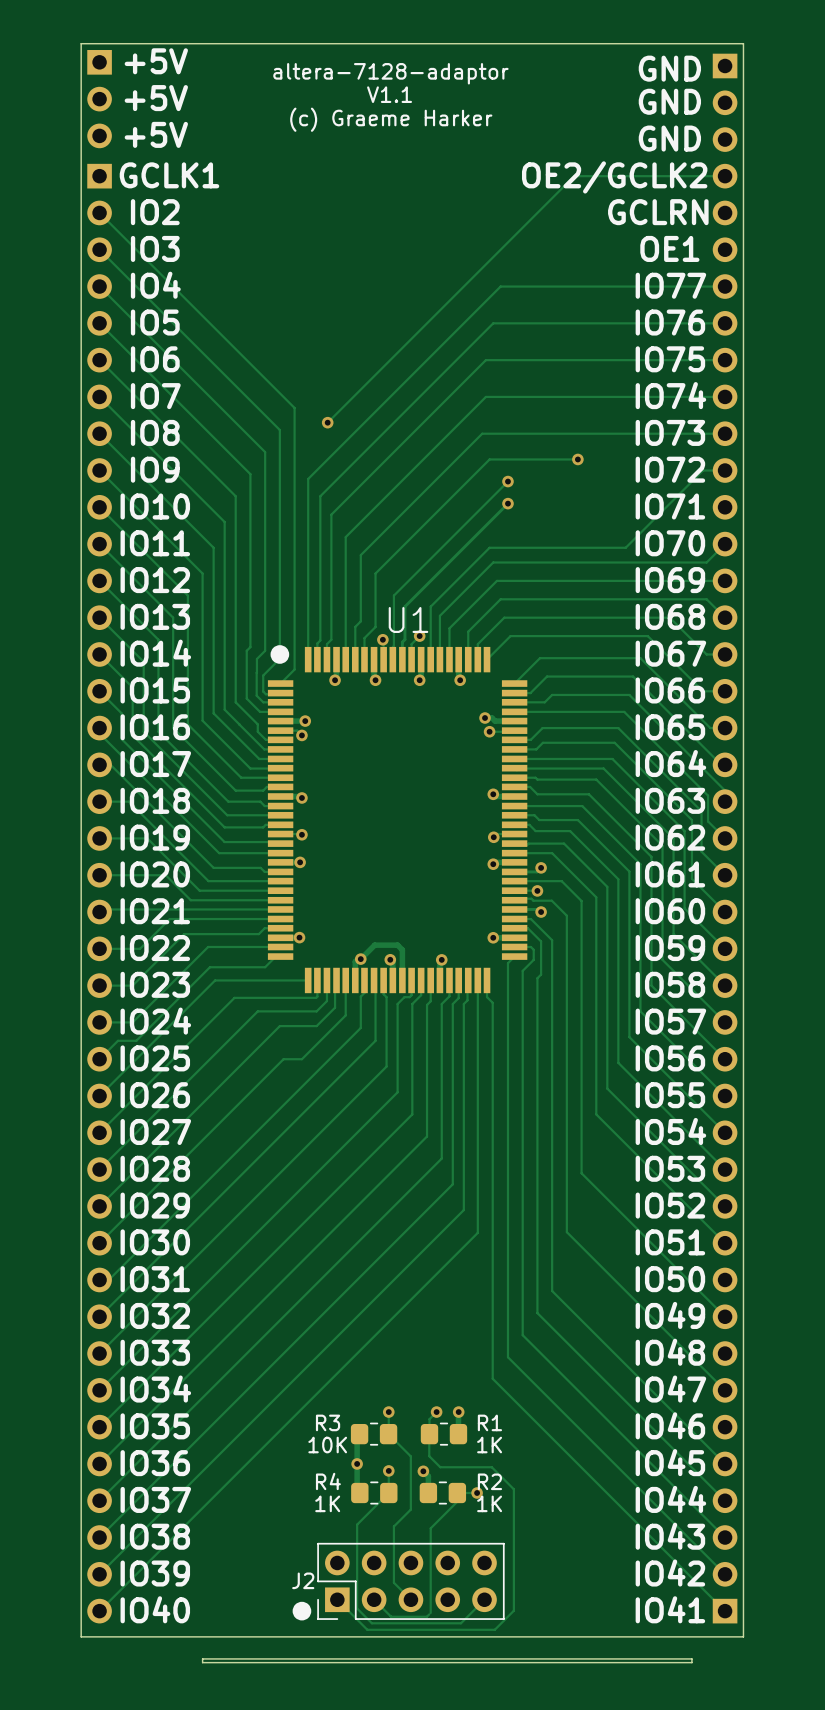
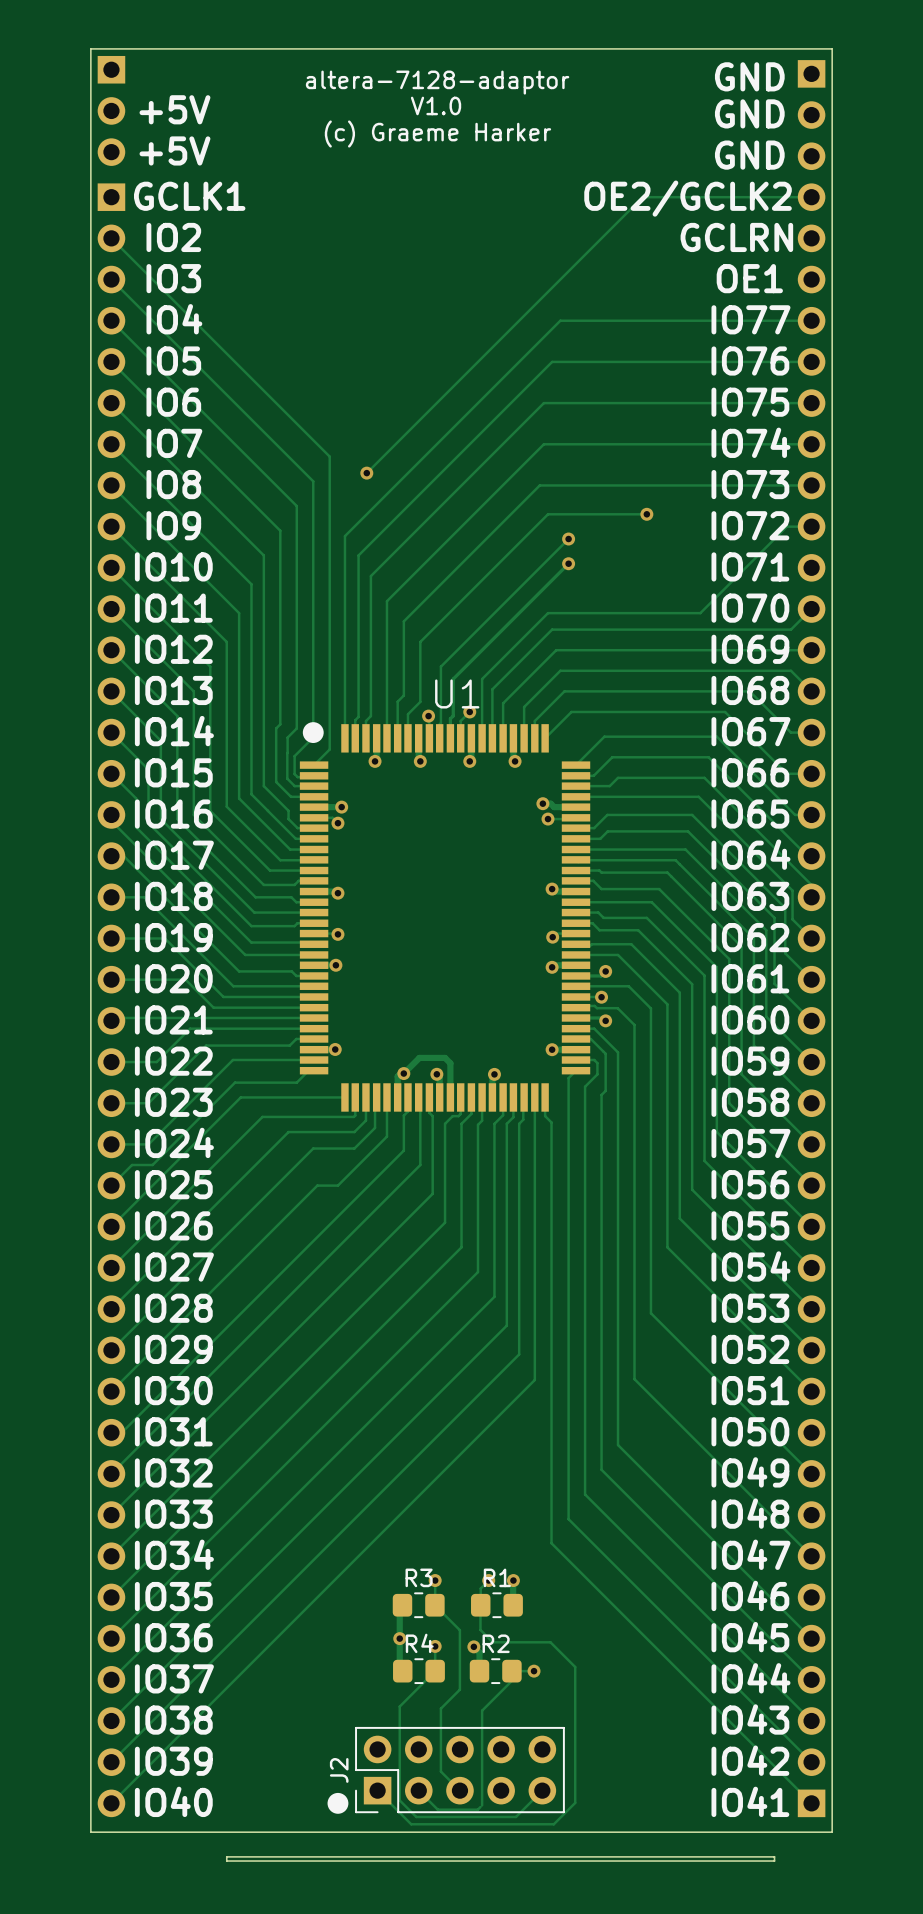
text: +5V (156, 61) -> none
text: V1.1 (389, 94) -> V1.0 (436, 105)
R3 name position: R3 (328, 1422) -> R3 (419, 1577)
R1 name position: R1 (489, 1422) -> R1 (497, 1577)
text: 10K (327, 1445) -> none
text: 1K (489, 1445) -> none
R4 name position: R4 (328, 1481) -> R4 (419, 1643)
R2 name position: R2 (489, 1481) -> R2 (496, 1643)
text: 1K (327, 1503) -> none
text: 1K (489, 1503) -> none
J2 name rotation: 0° (303, 1580) -> 90° counterclockwise (339, 1770)

